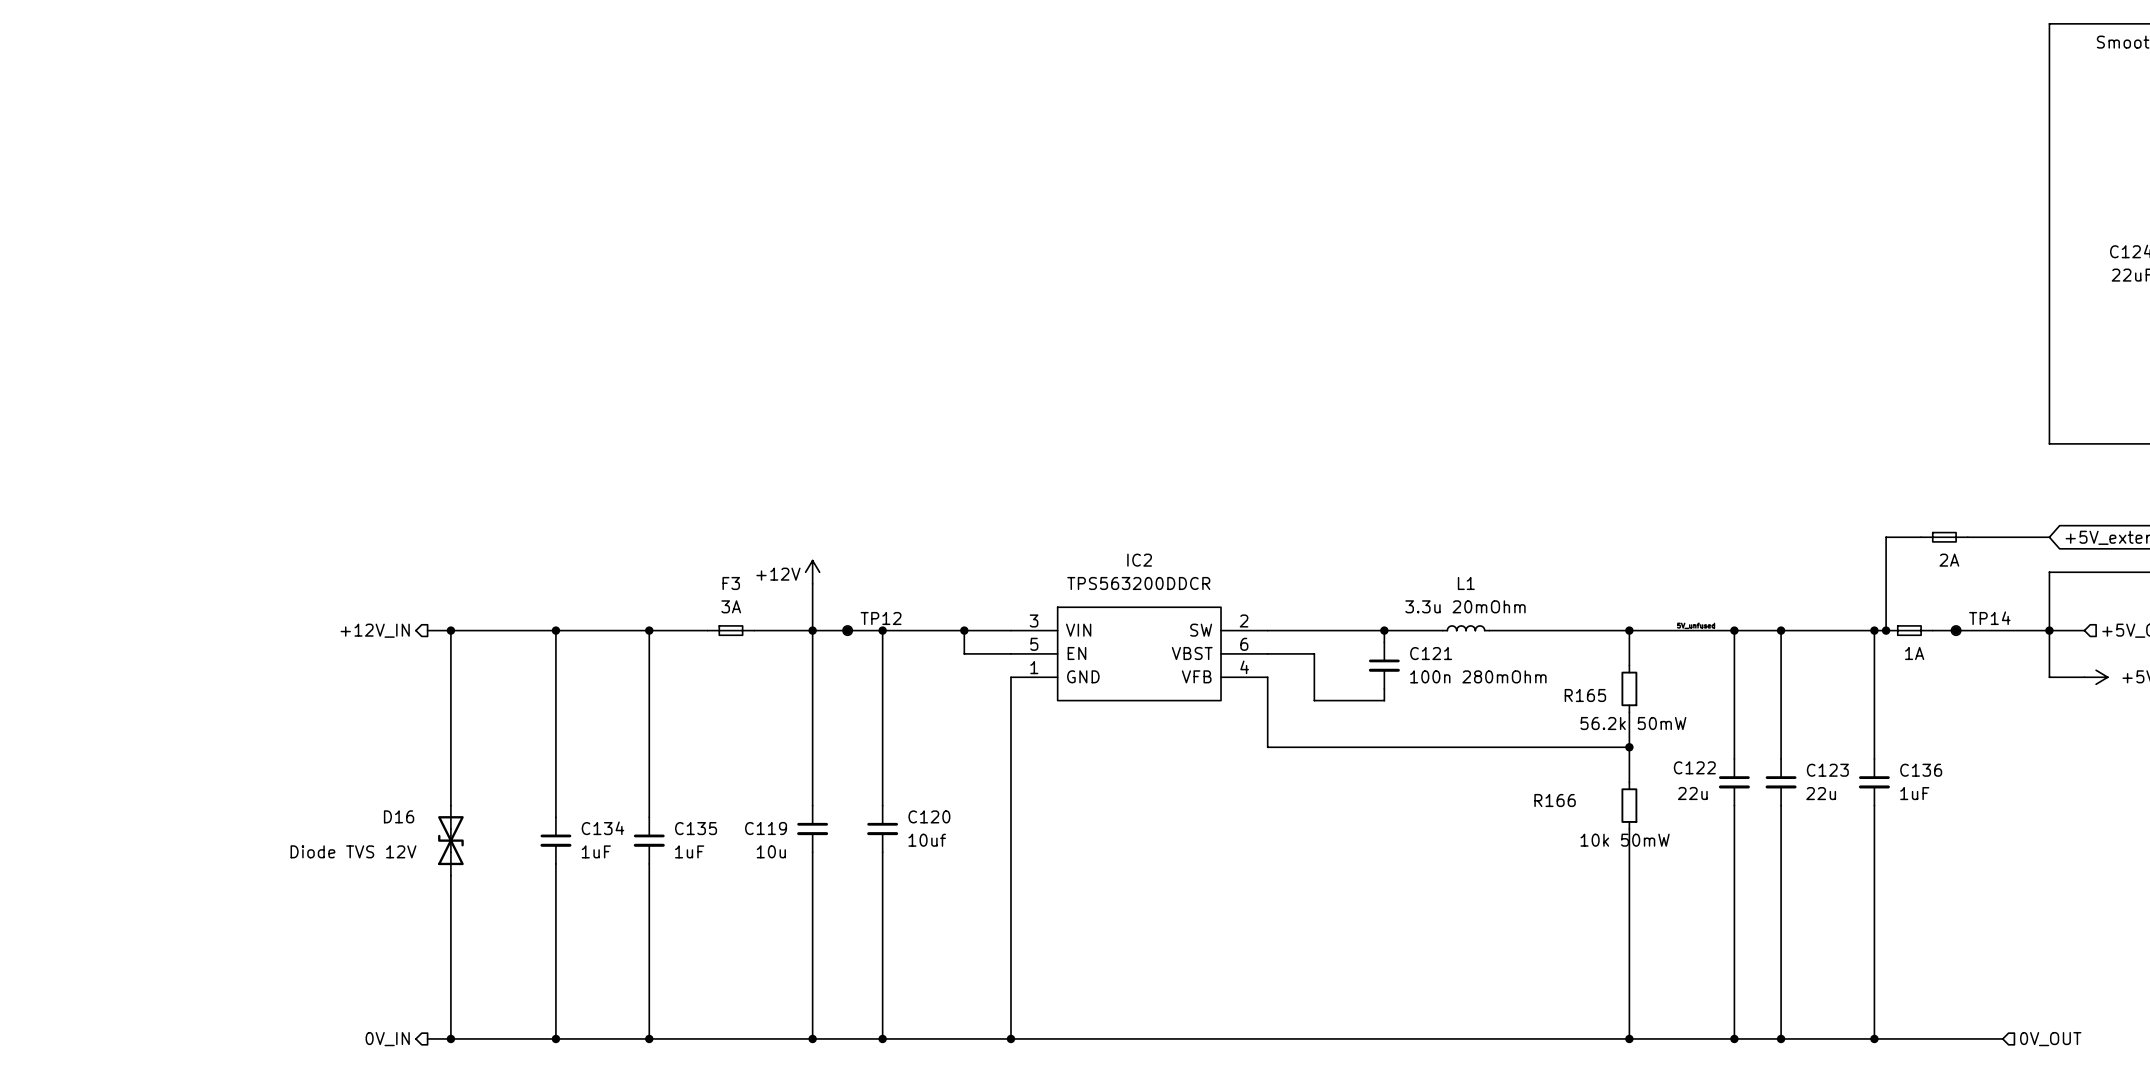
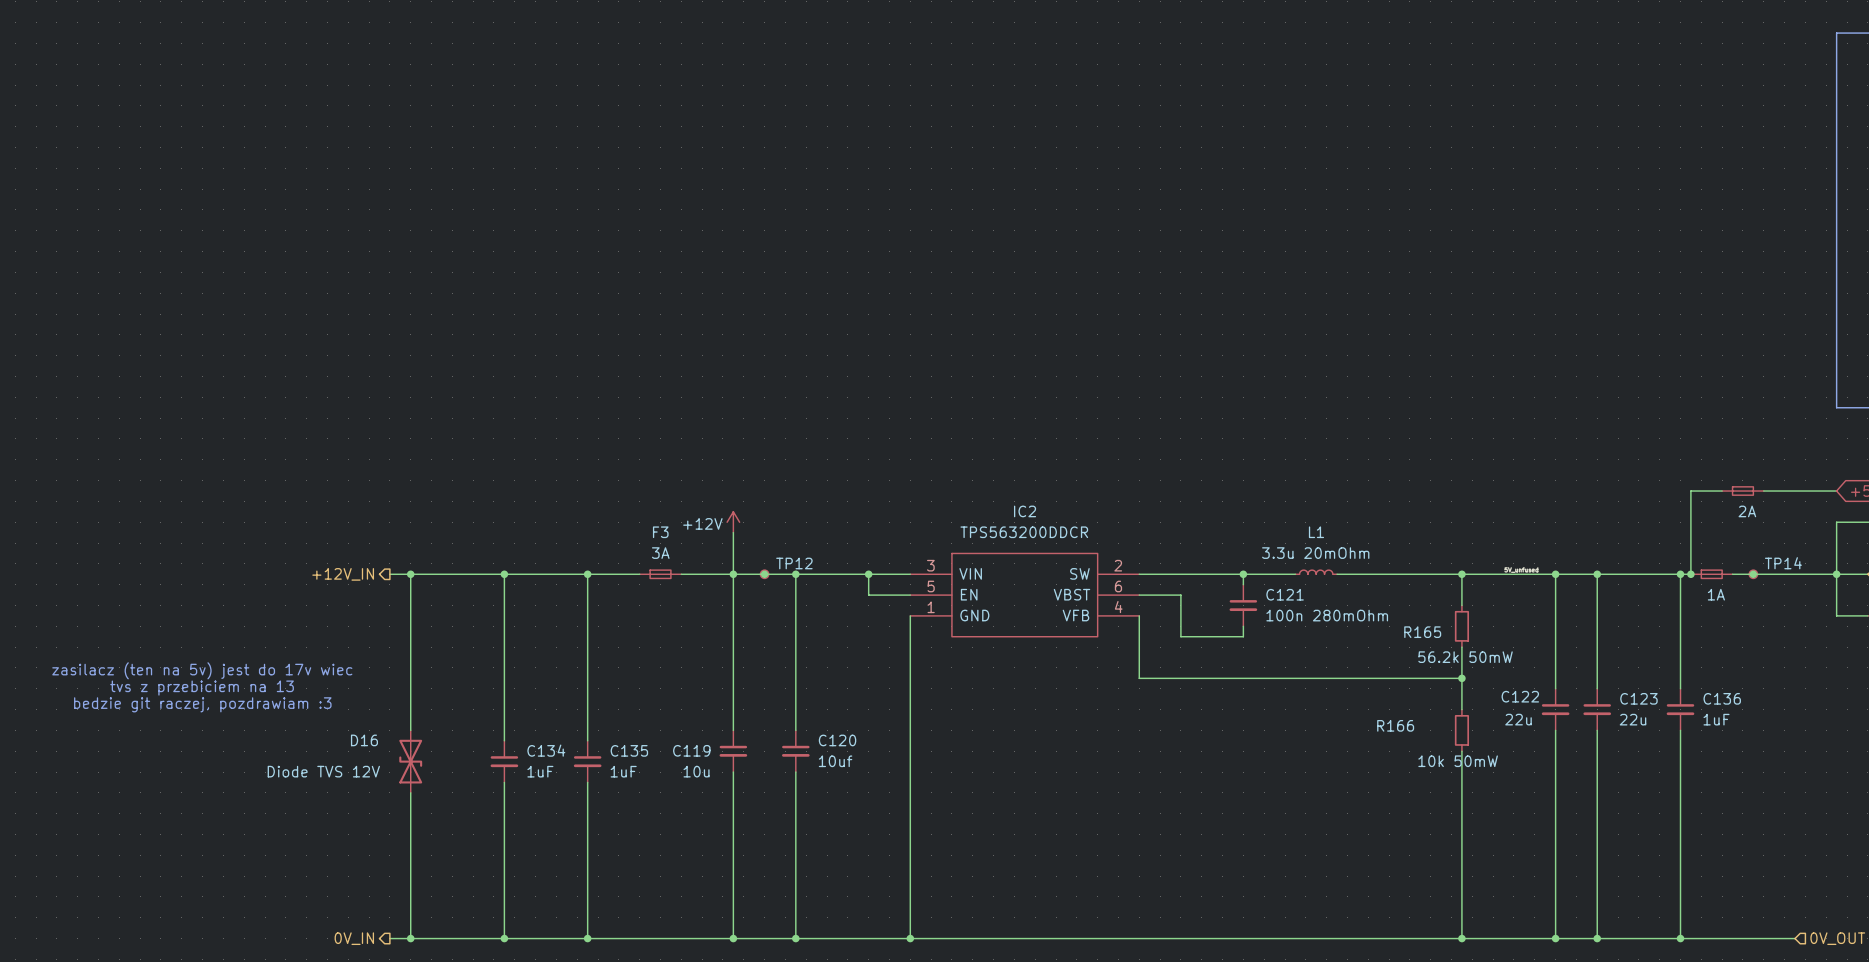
text: none -> zasilacz (ten na 5v) jest do 17v wiec (202, 670)
text: none -> tvs z przebiciem na 13 (202, 688)
text: none -> bedzie git raczej, pozdrawiam :3 (202, 704)

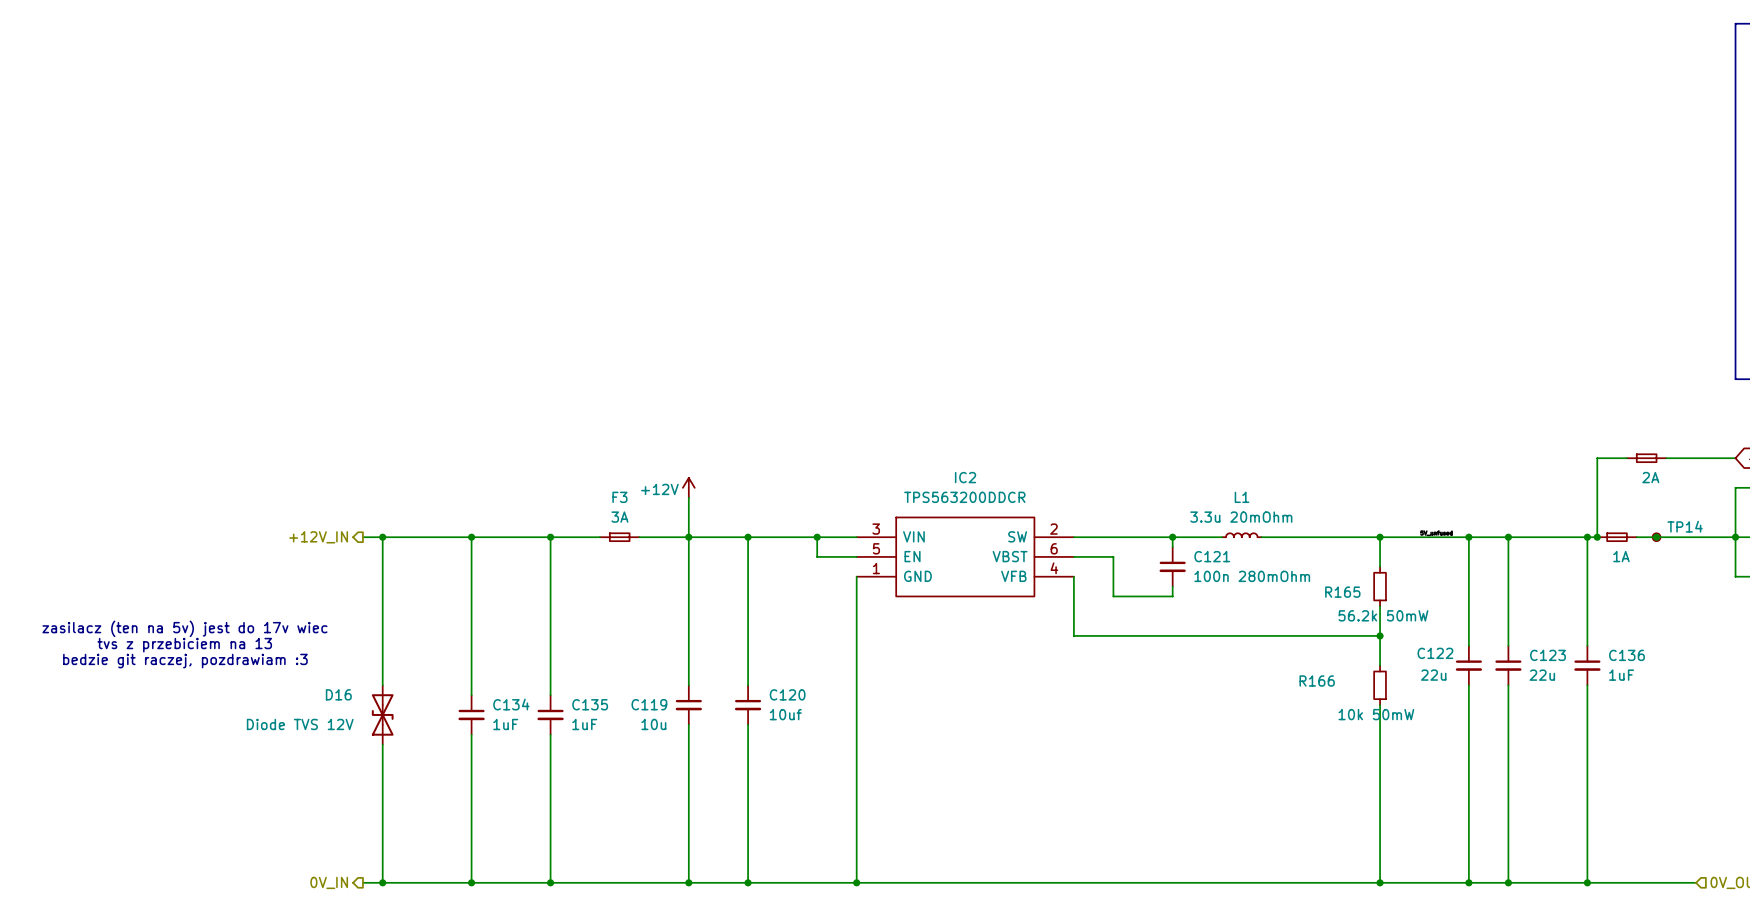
junction: (764, 574) -> none
TP12: (764, 574) -> none

